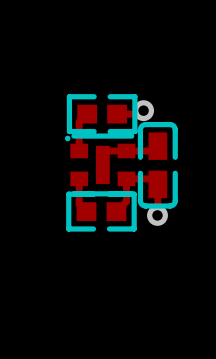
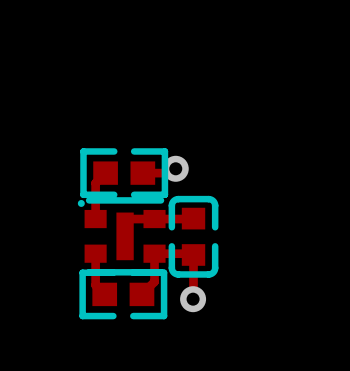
part footprint: [137, 121, 178, 209] -> [168, 195, 219, 278]

